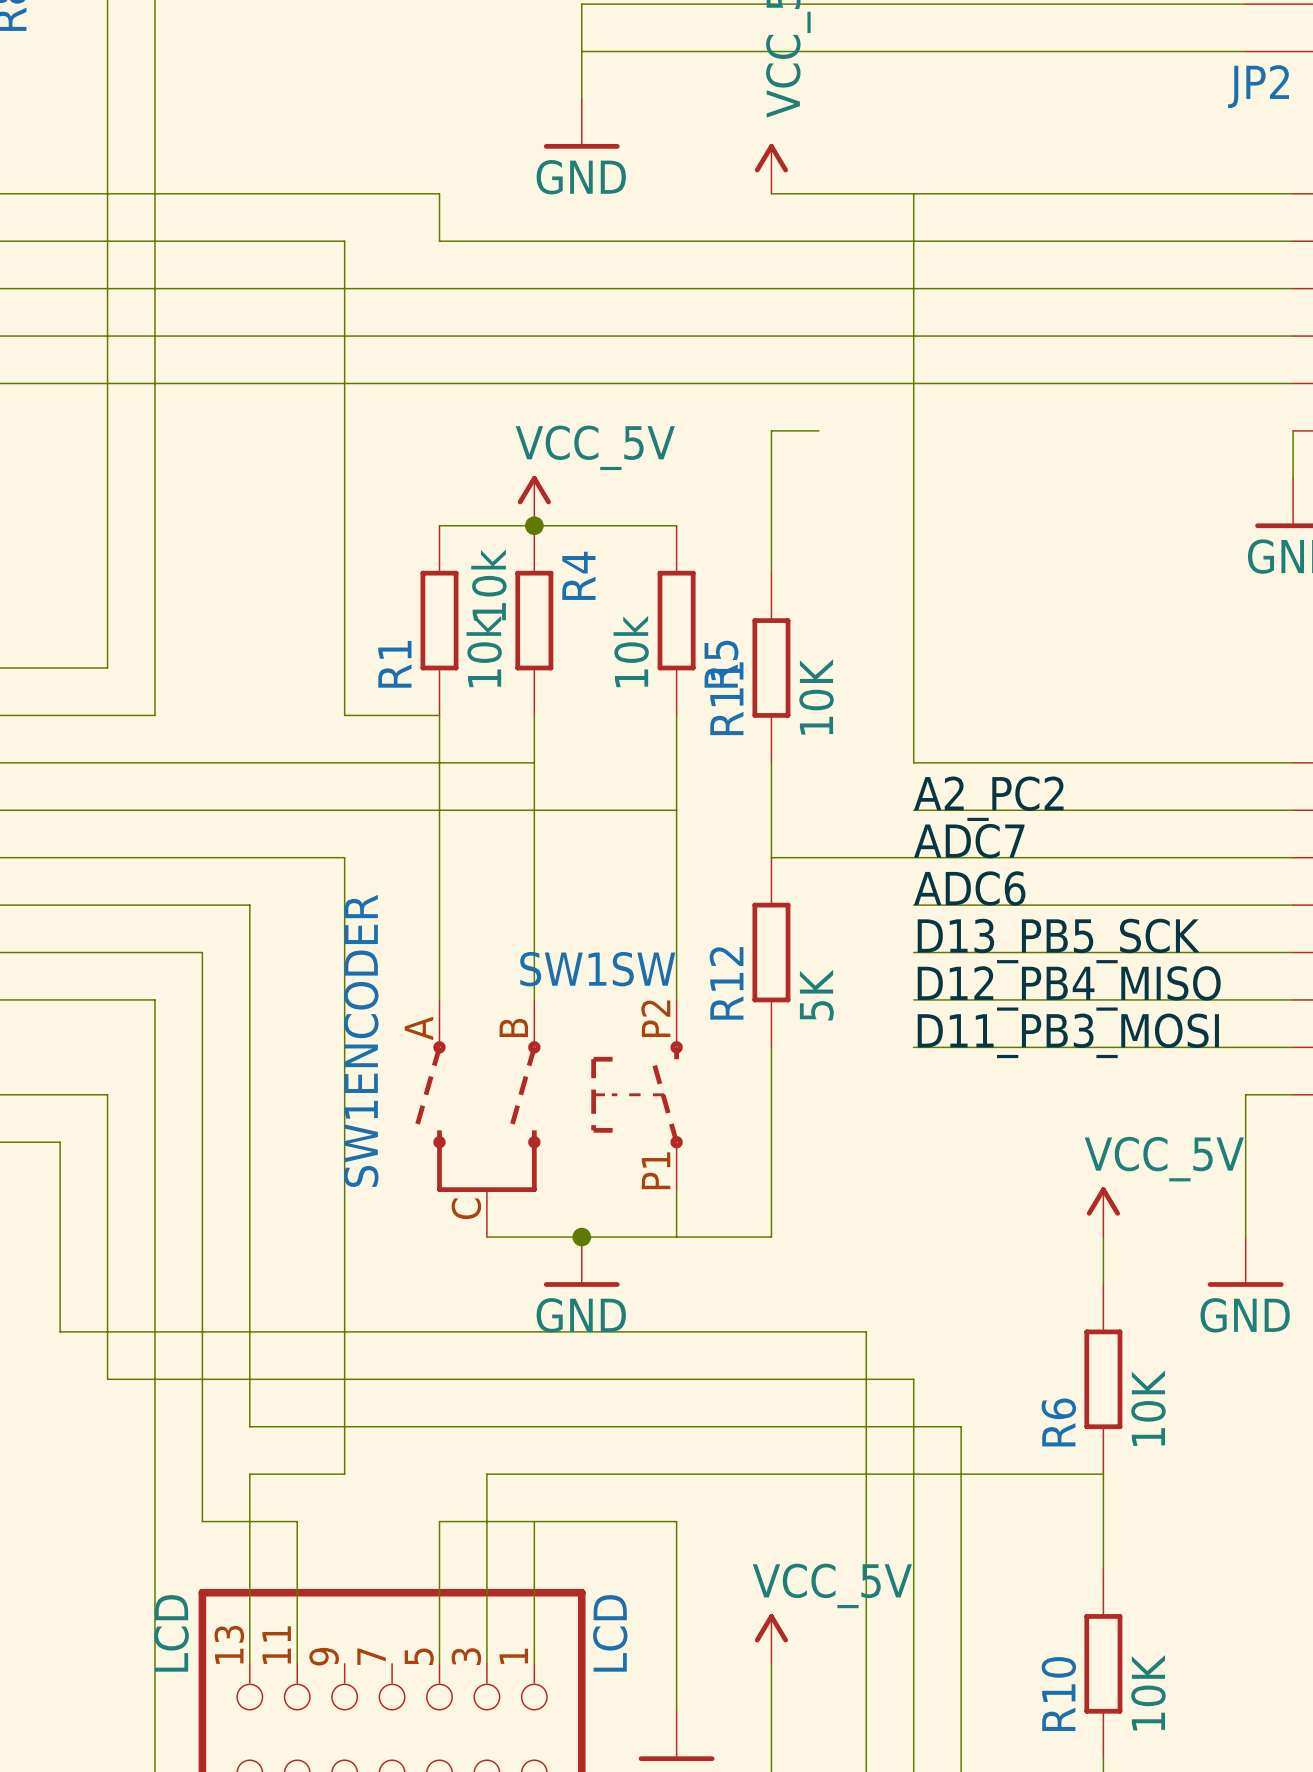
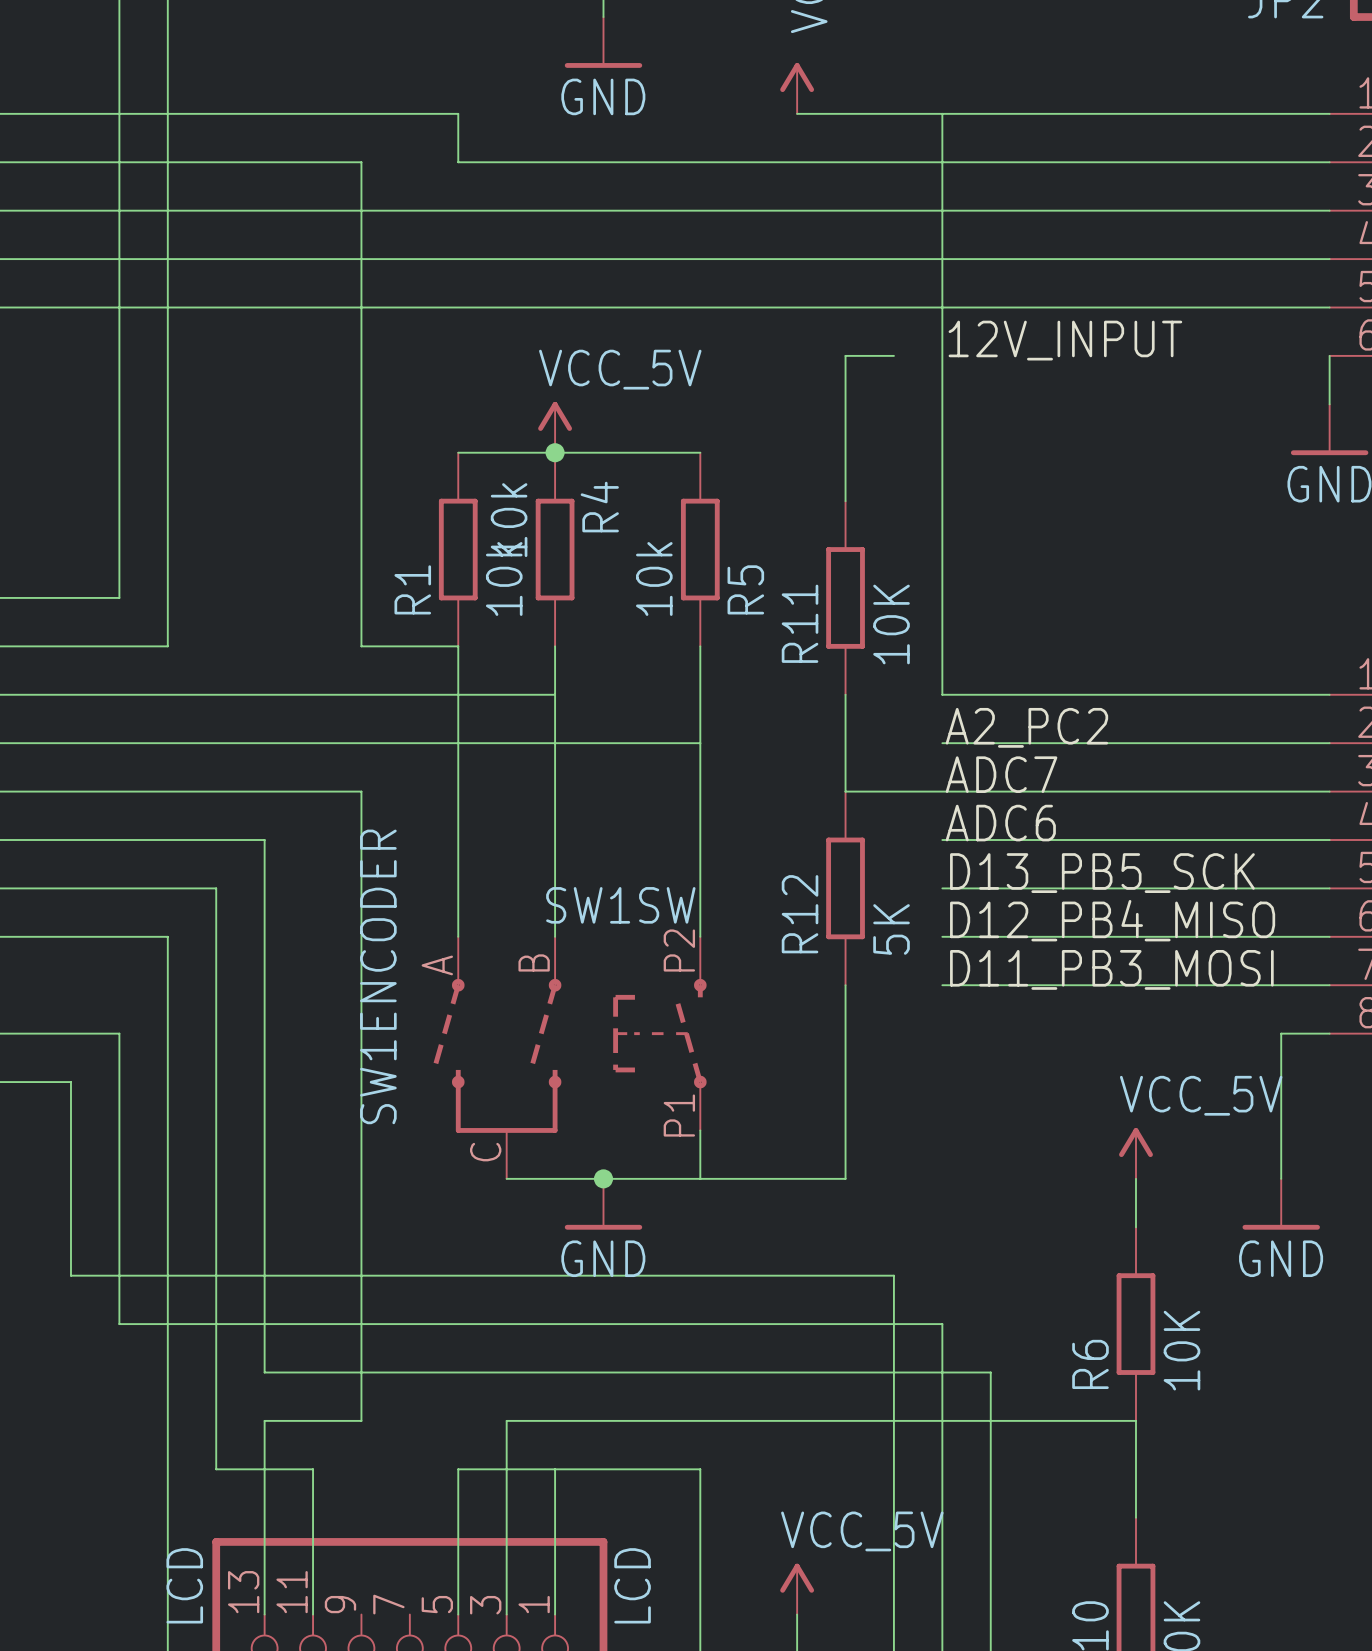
label: none -> 12V_INPUT (1065, 340)
wire: (818, 430) (771, 430) (771, 573) -> (893, 355) (845, 355) (845, 501)
R11 position: (771, 668) -> (845, 597)
wire: (771, 762) (771, 857) (818, 857) -> (845, 694) (845, 791)
R12 position: (771, 952) -> (845, 888)
wire: (771, 1047) (771, 1237) -> (845, 985) (845, 1178) (797, 1178)

